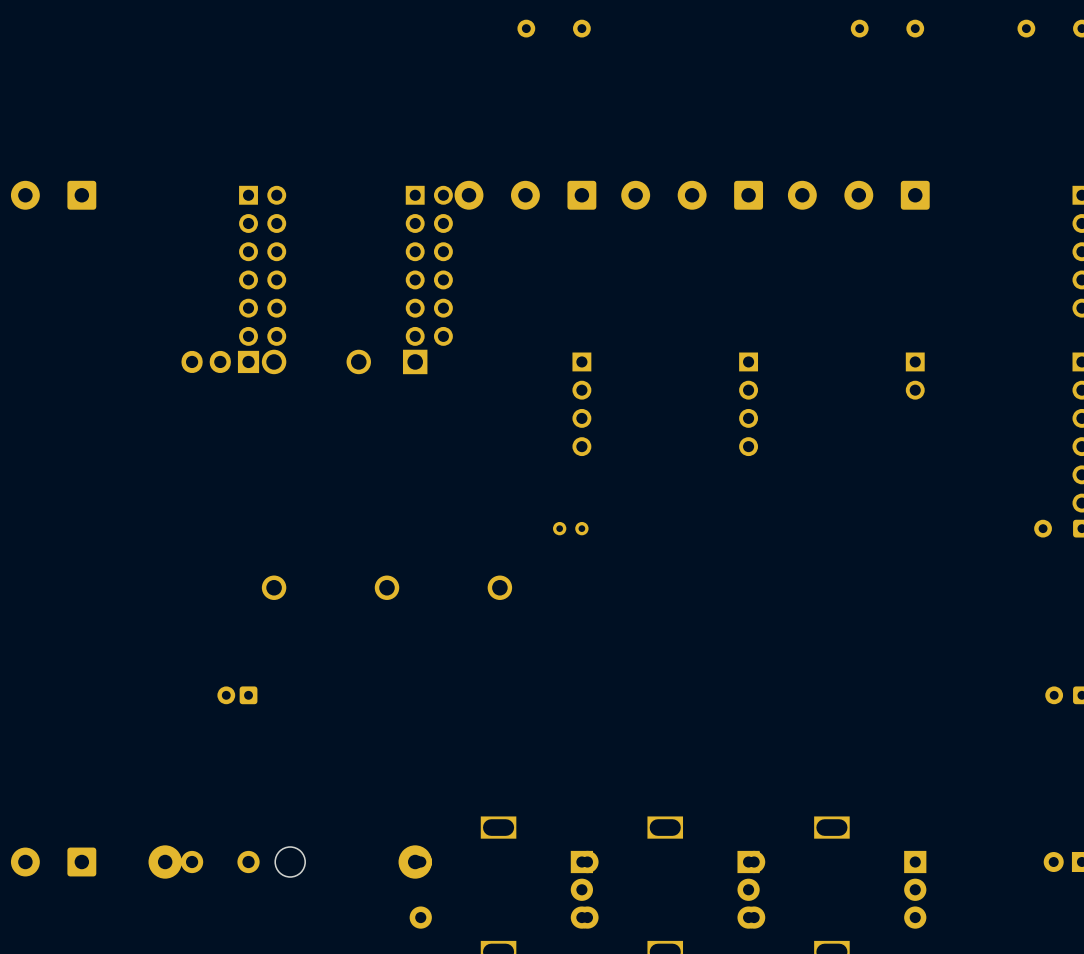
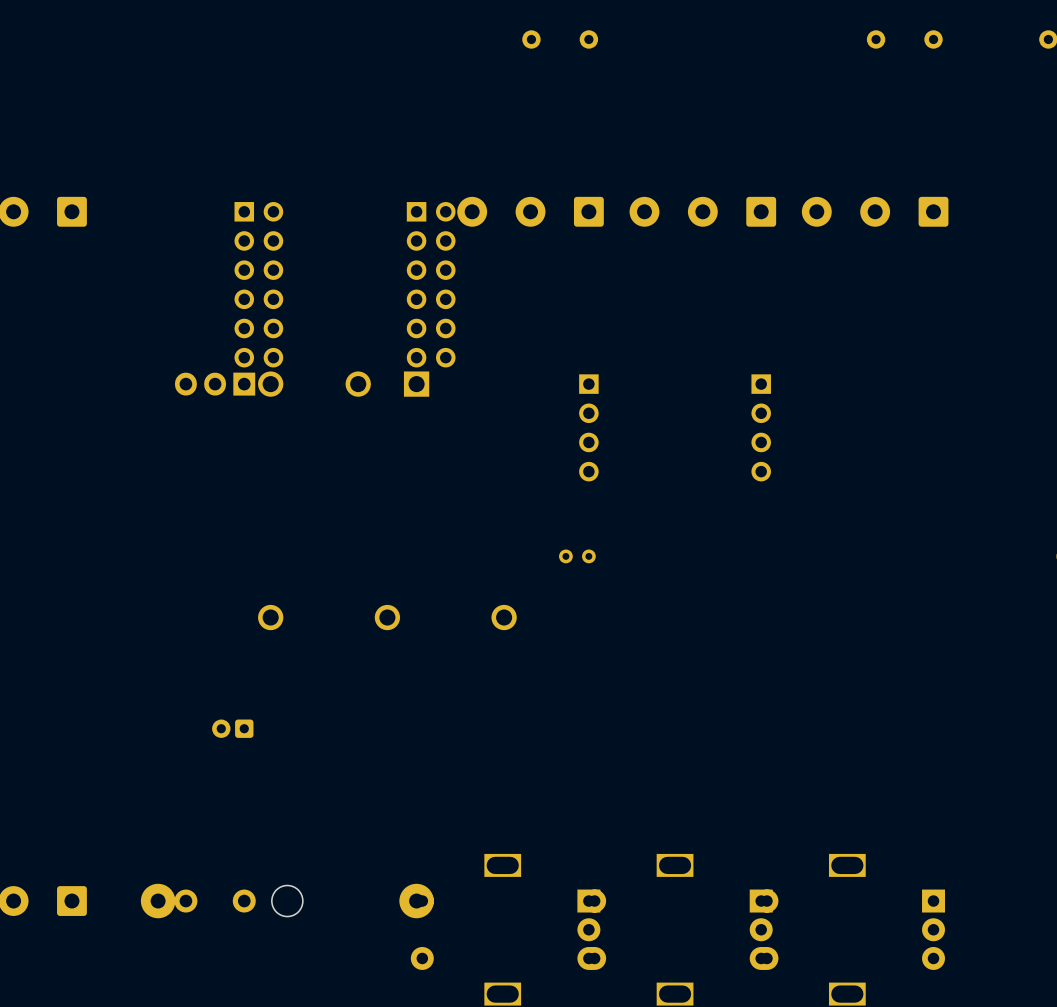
part: (915, 376) -> none

